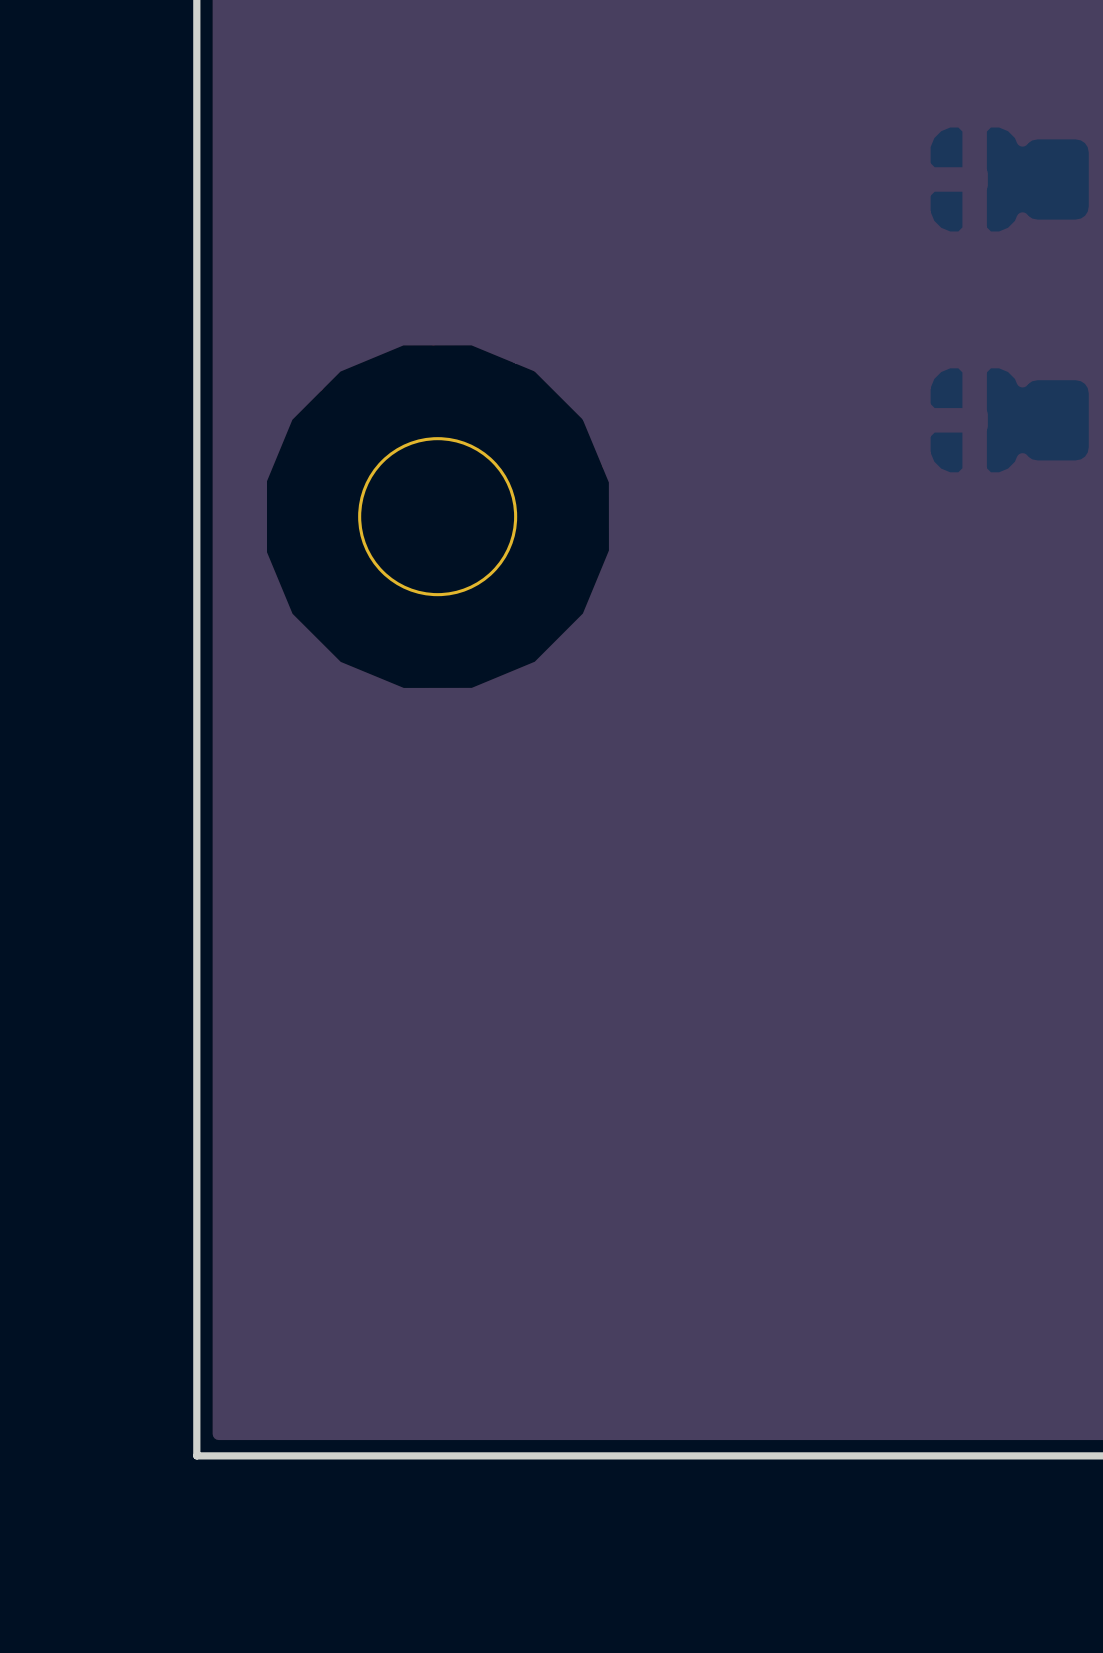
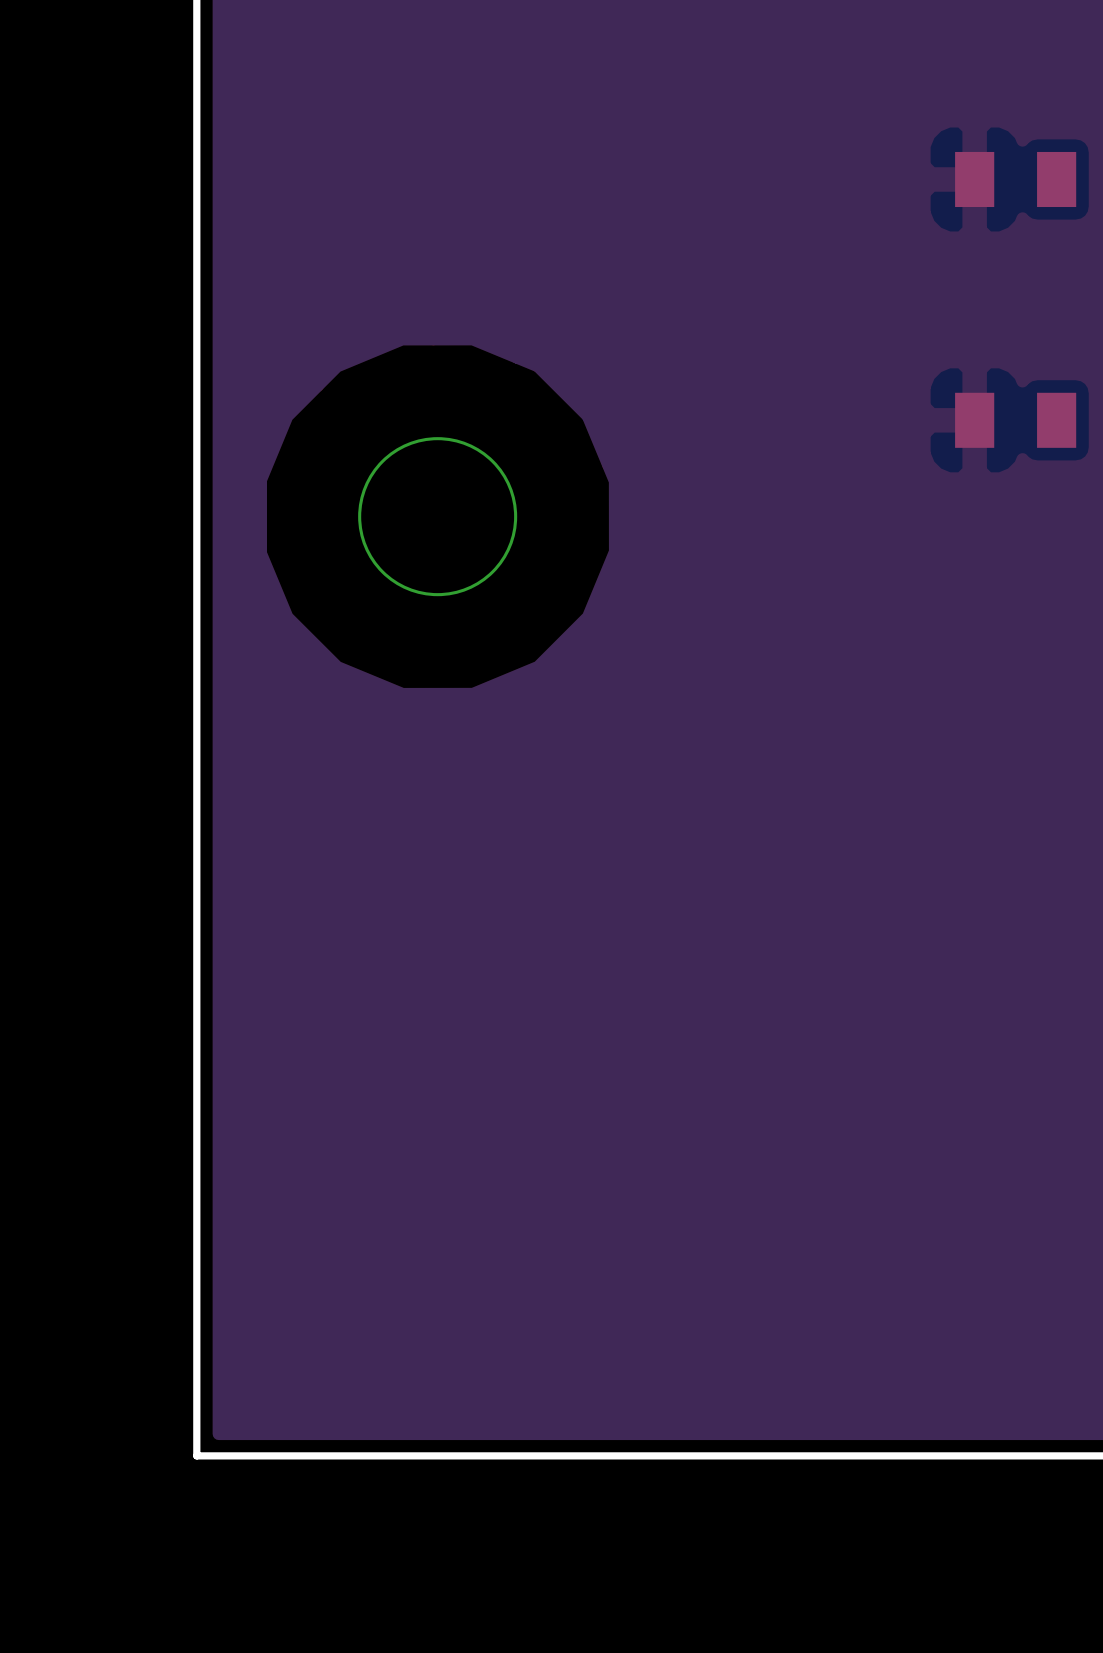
part: none -> (1015, 179)
part: none -> (1015, 420)

